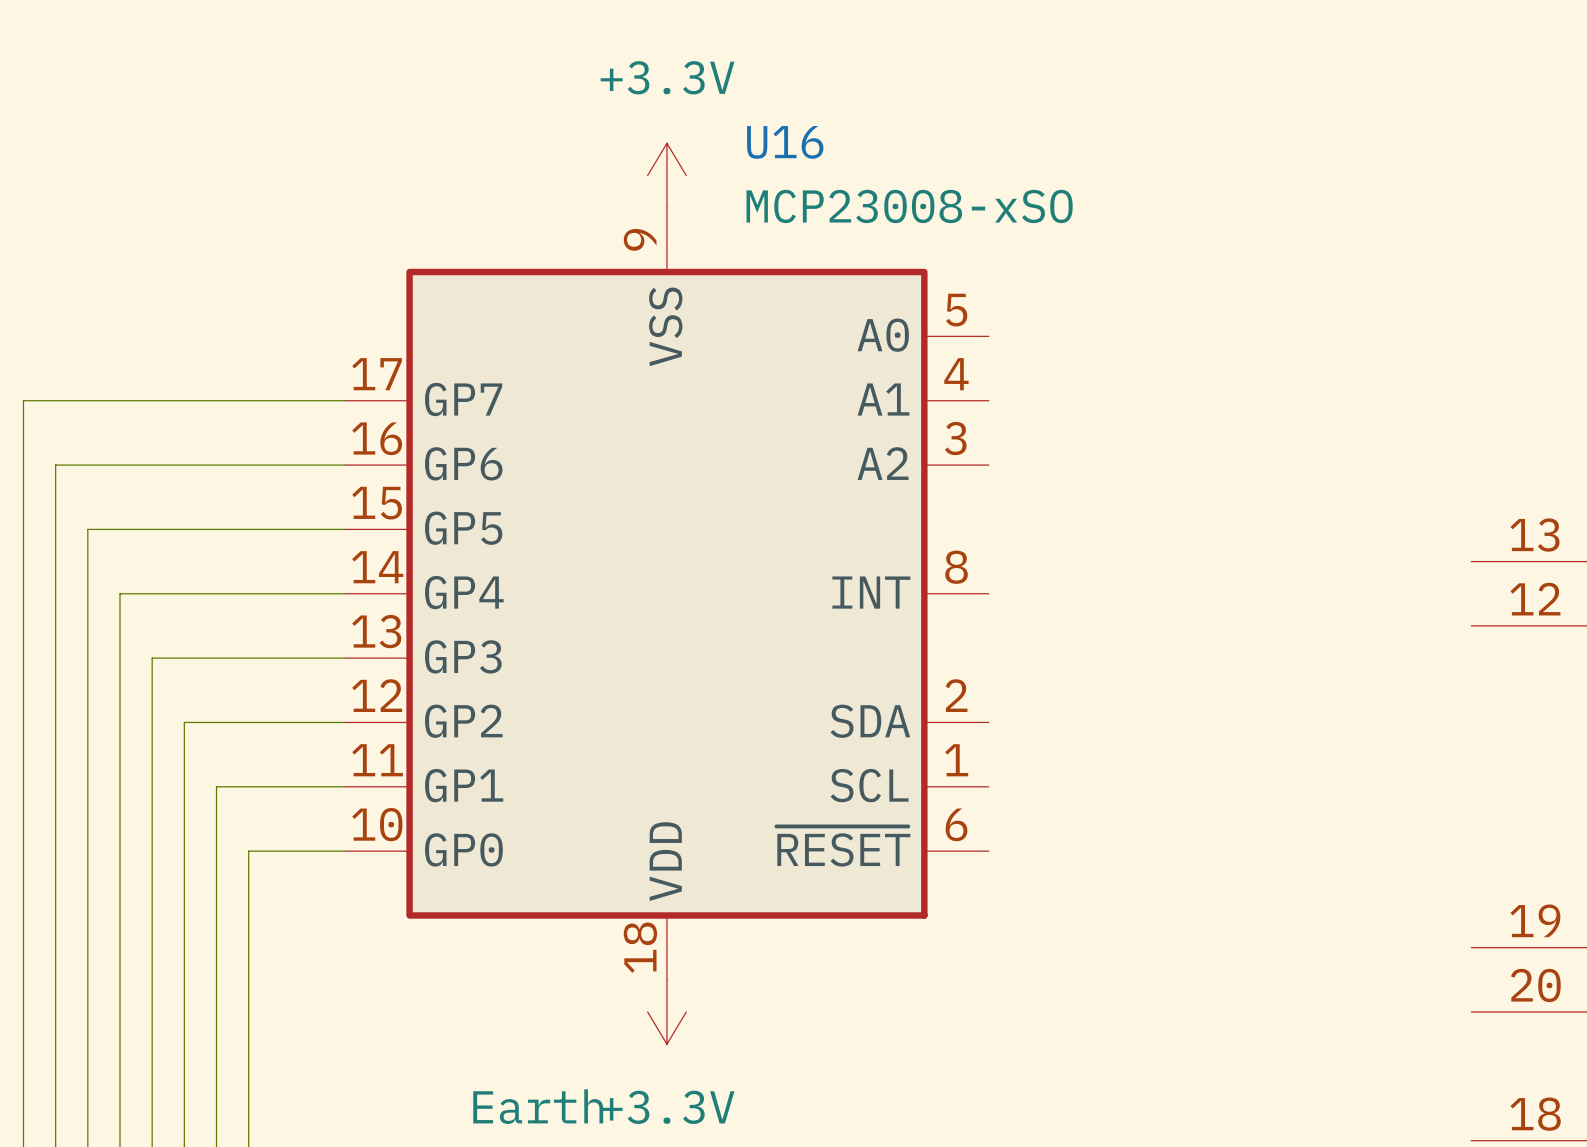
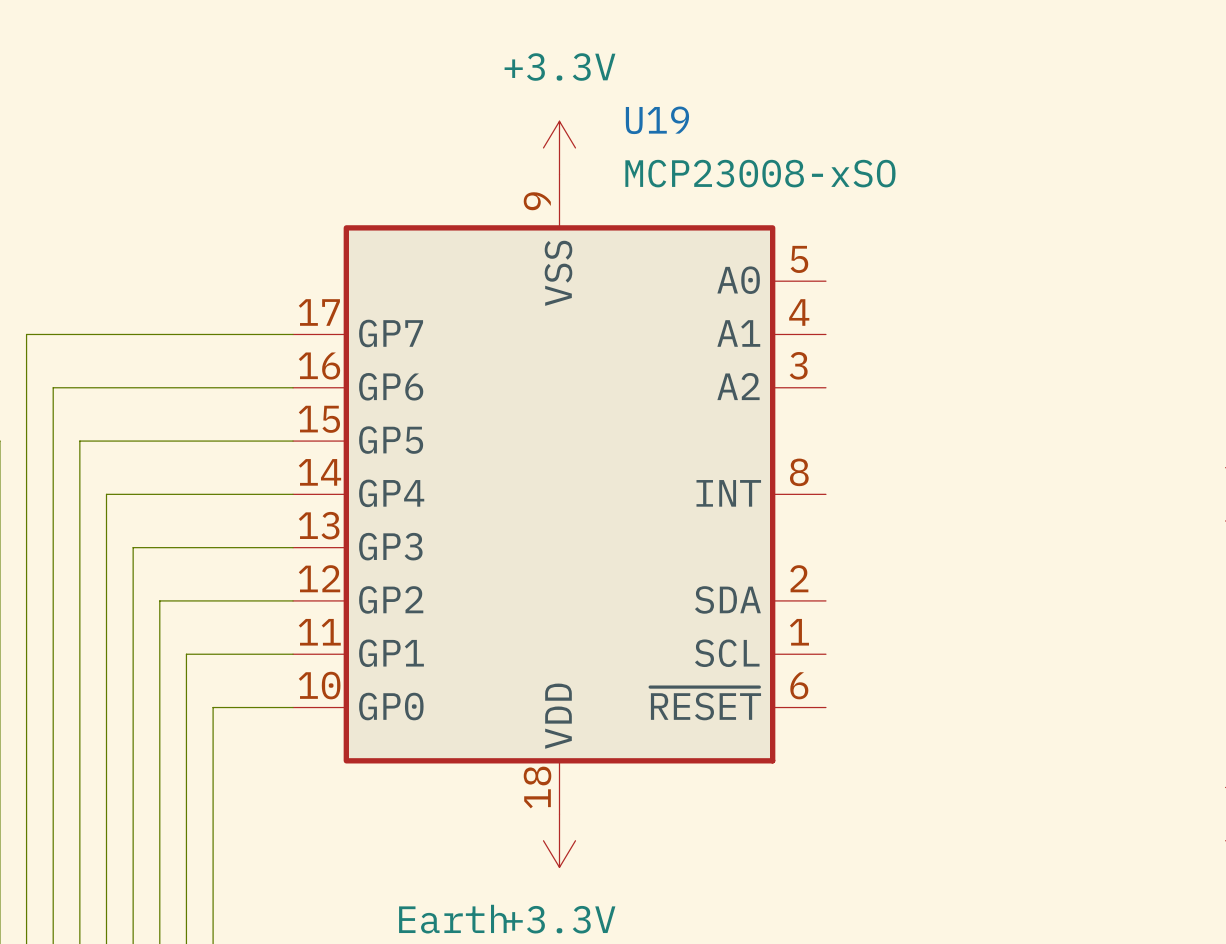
U16 name: U16 (785, 142) -> U19 (657, 120)

